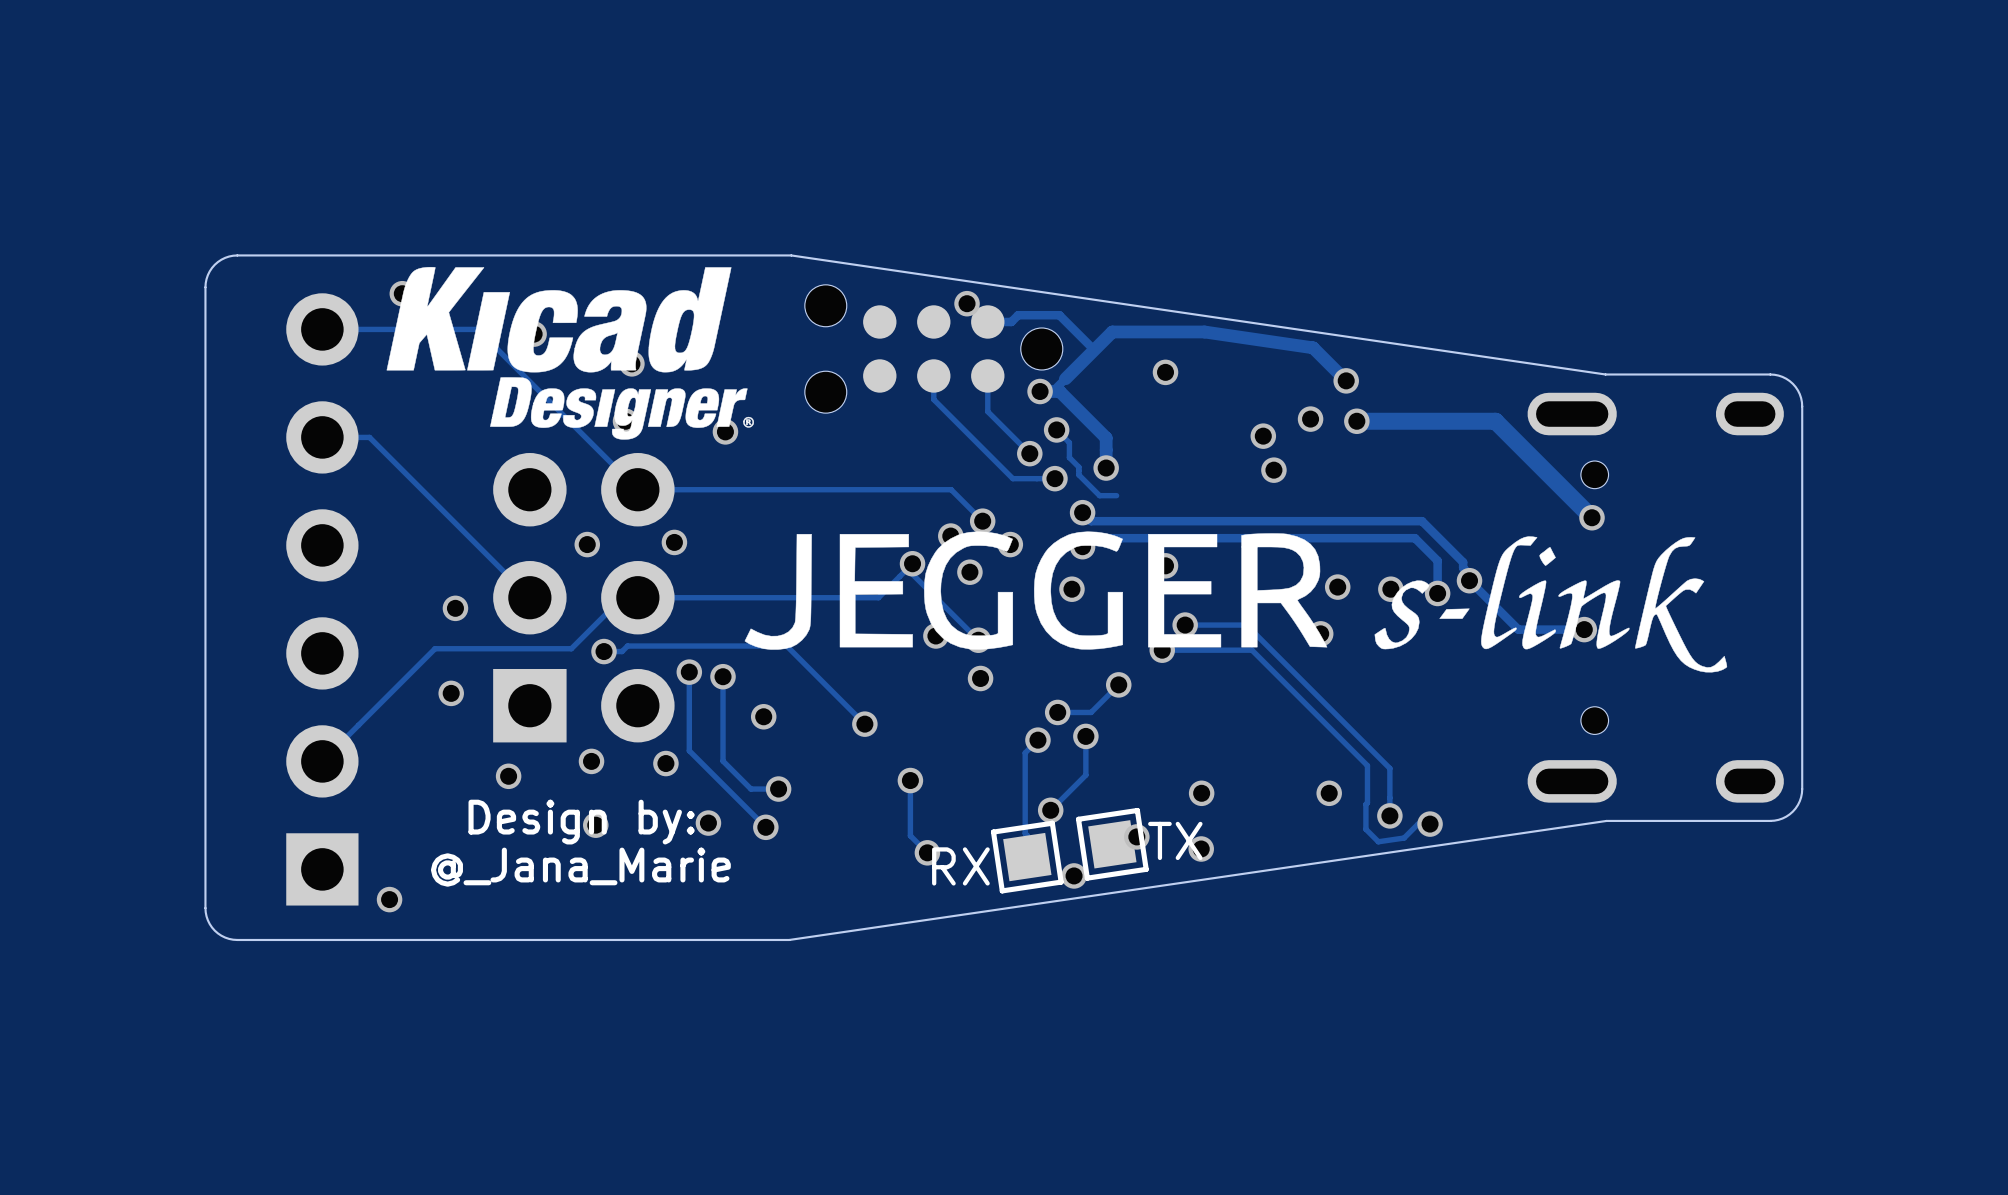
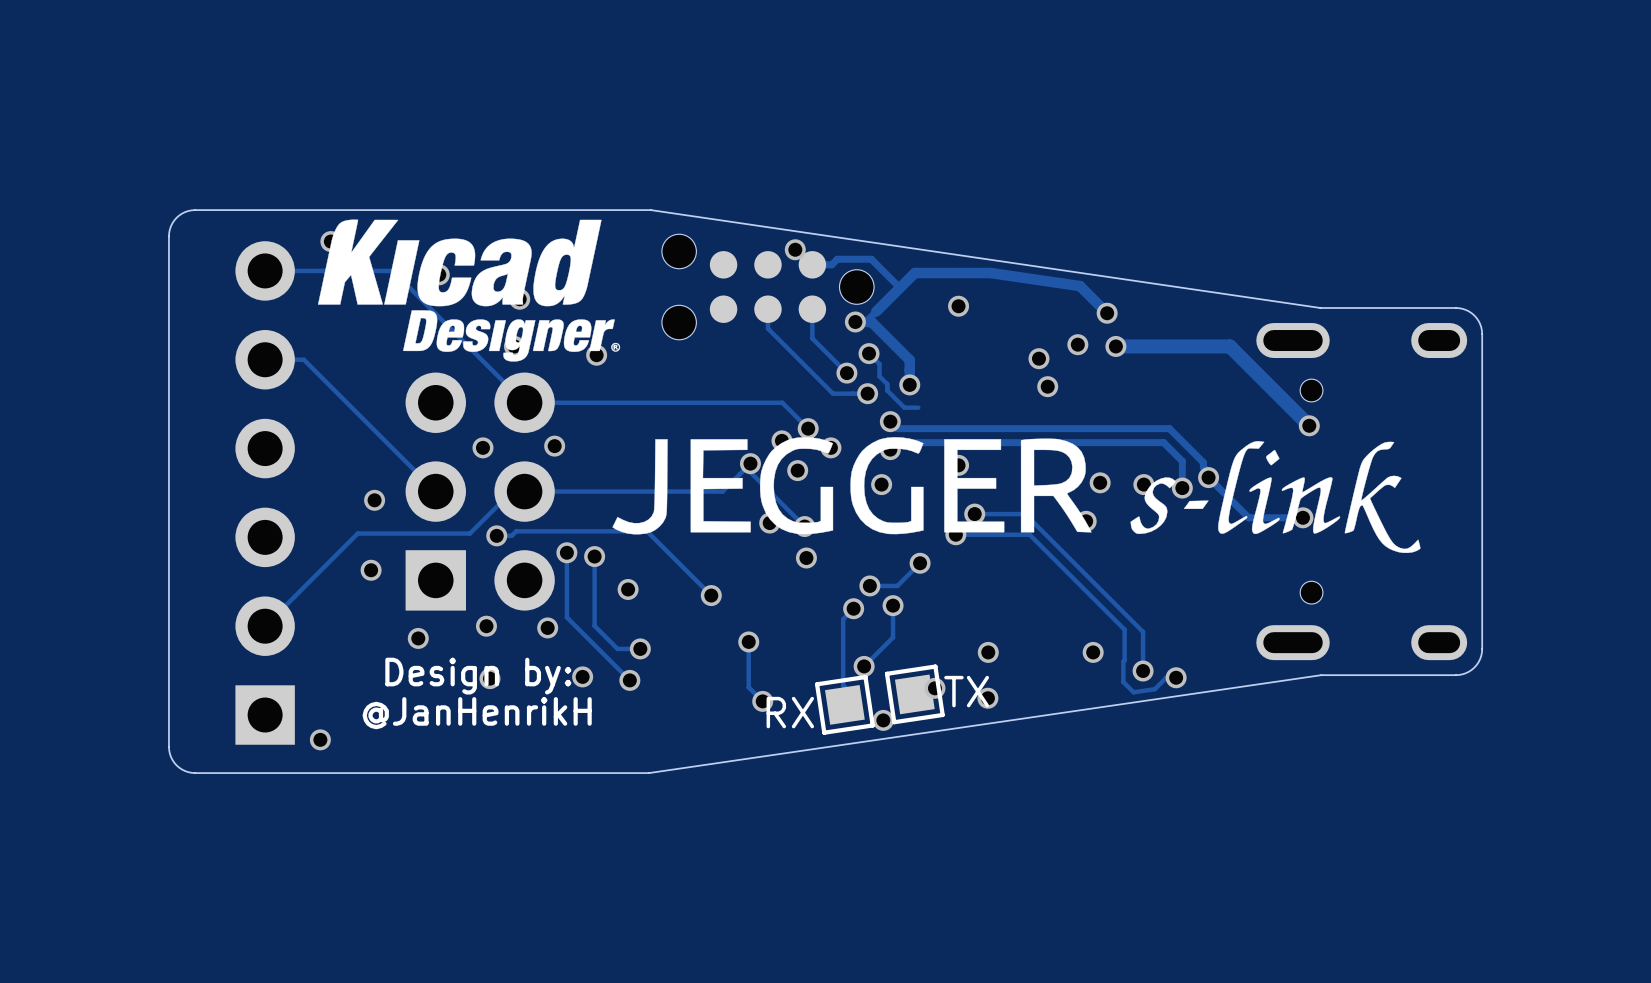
text: @_Jana_Marie (580, 867) -> @JanHenrikH (477, 713)

